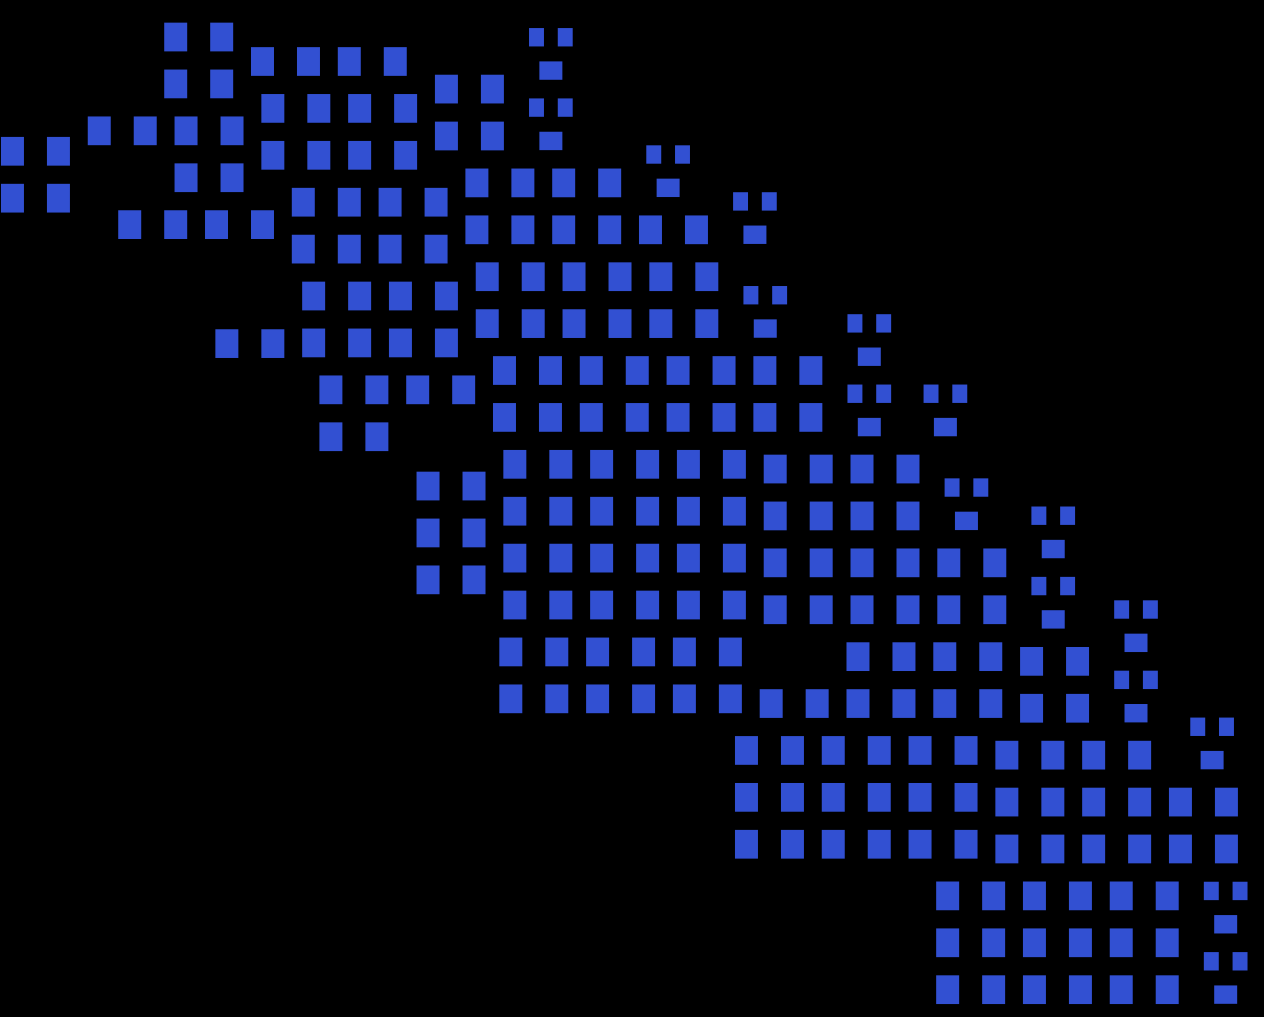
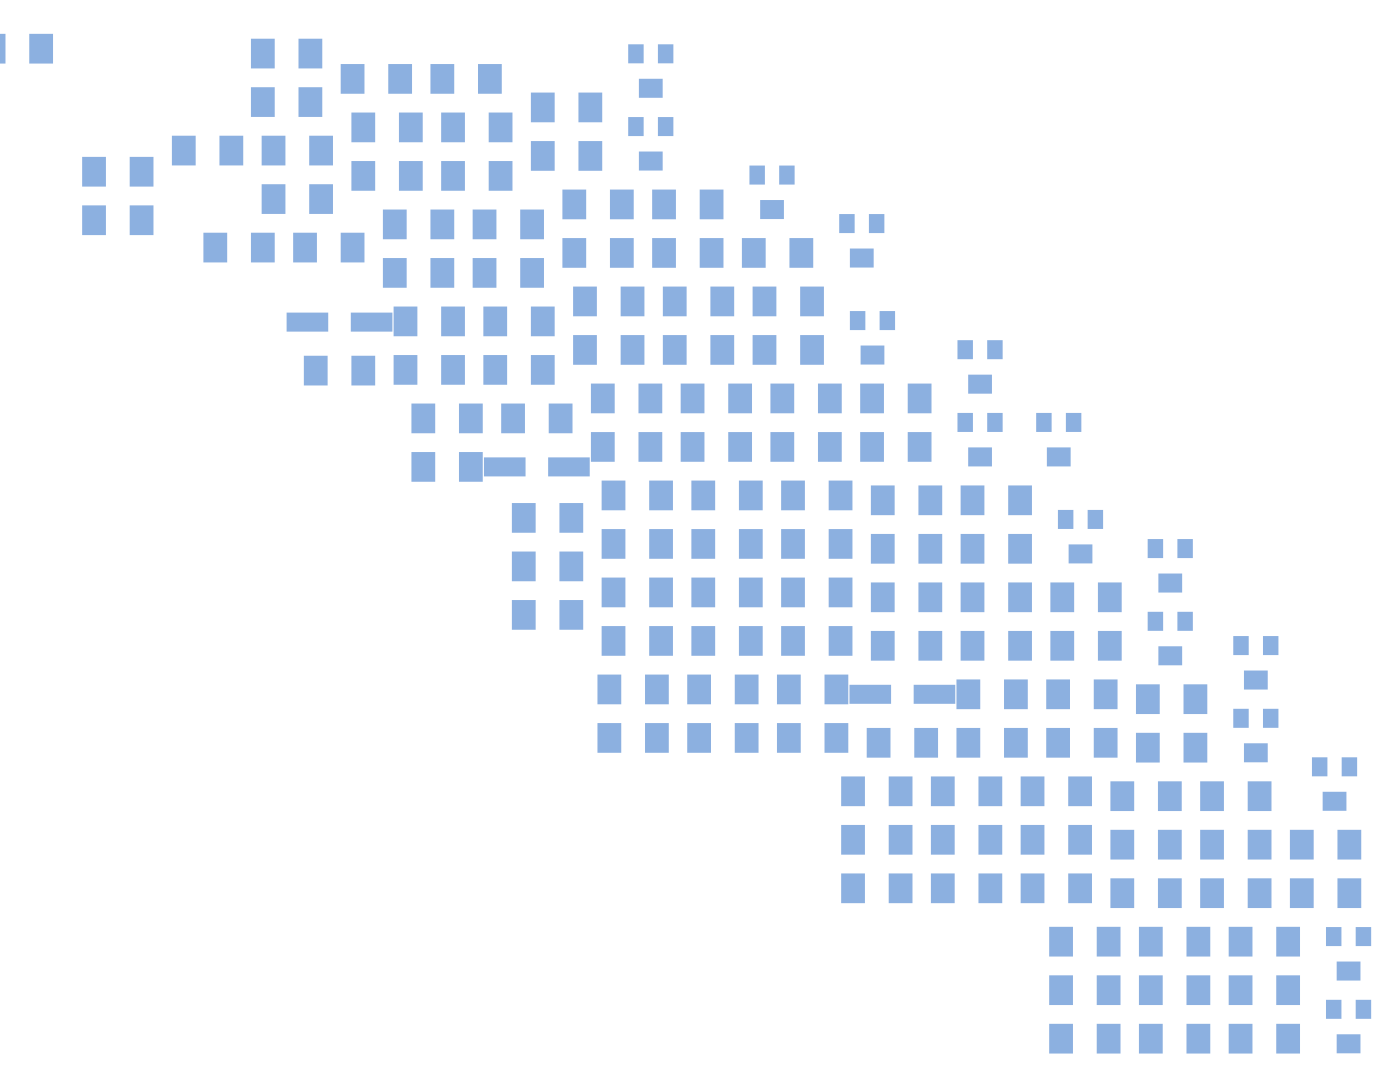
part: none -> (339, 322)
part: none -> (536, 466)
part: none -> (902, 694)

